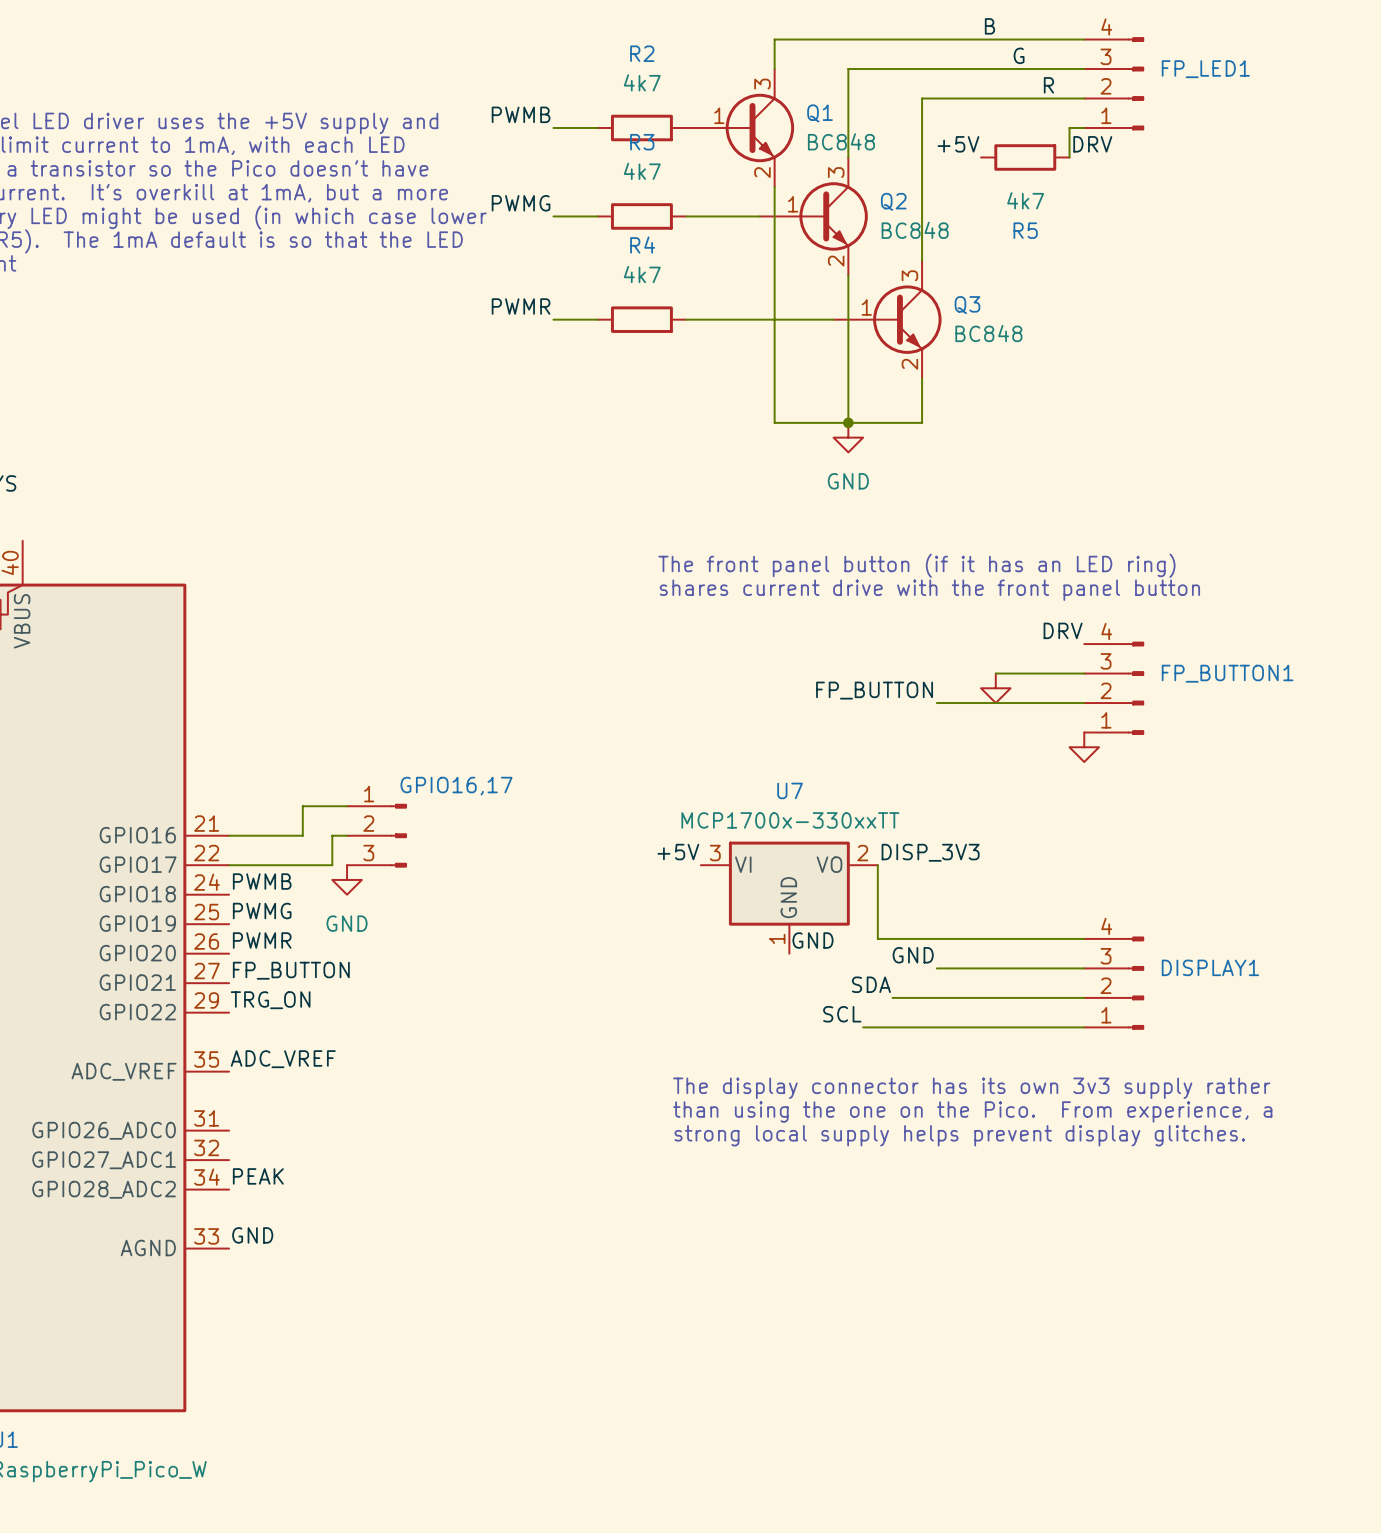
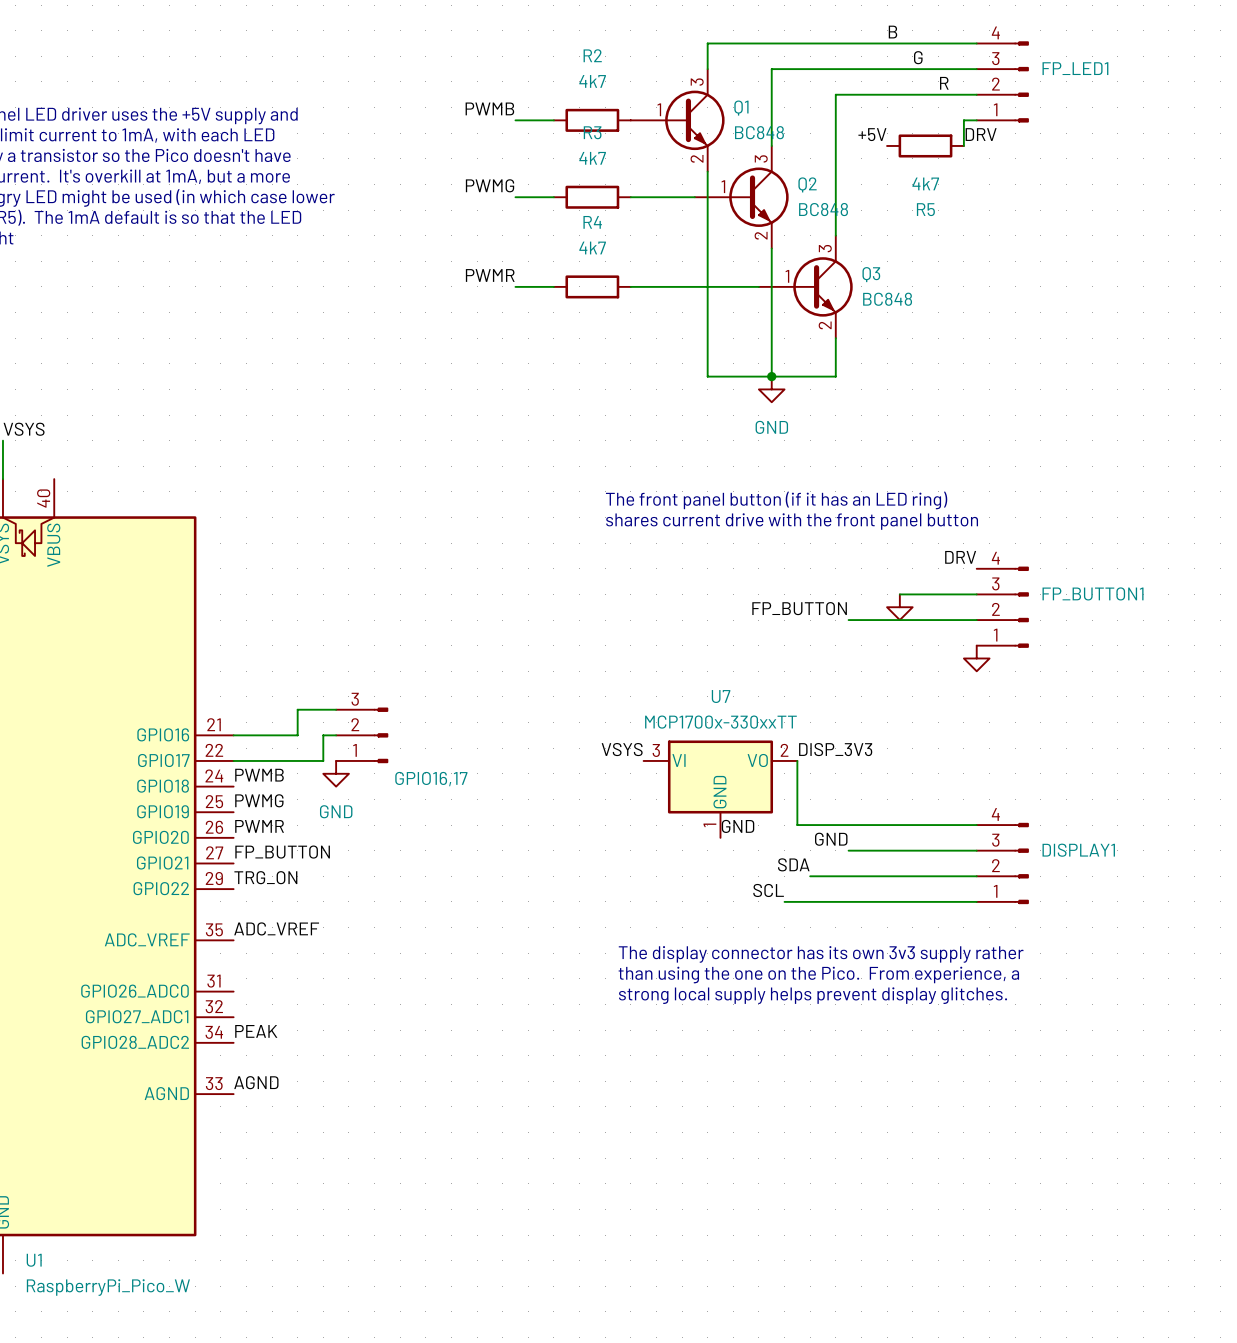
GPIO16,17 flip: as is (398, 835) -> up-down (380, 735)
label: +5V (678, 852) -> VSYS (622, 749)
label: GND (252, 1235) -> AGND (256, 1082)

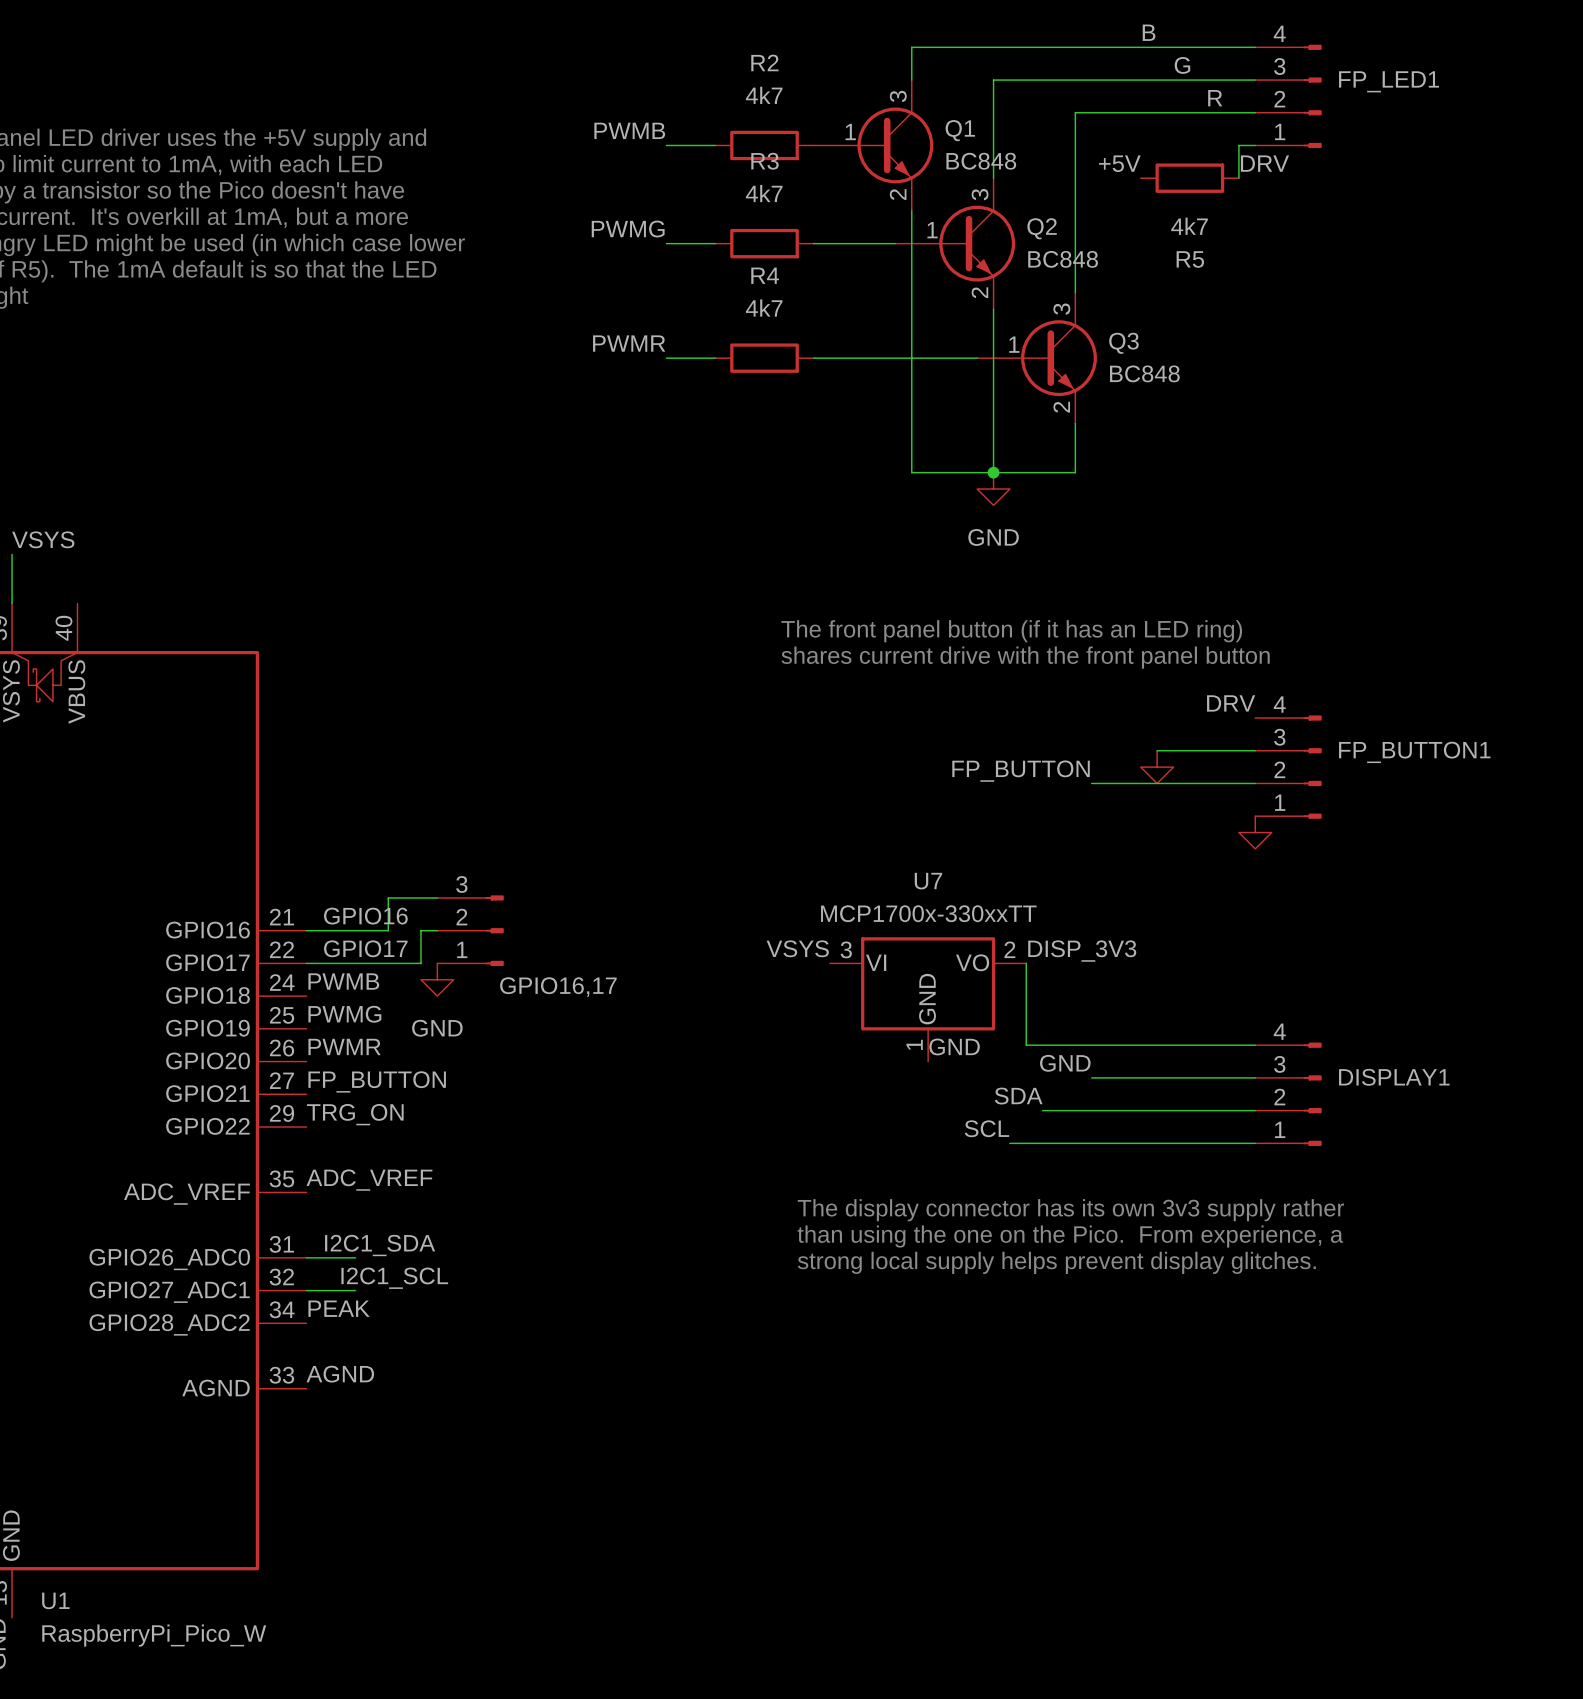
label: none -> GPIO16 (365, 916)
label: none -> GPIO17 (365, 948)
label: none -> I2C1_SDA (380, 1245)
wire: none -> (306, 1257) (355, 1257)
label: none -> I2C1_SCL (394, 1278)
wire: none -> (306, 1290) (355, 1290)

